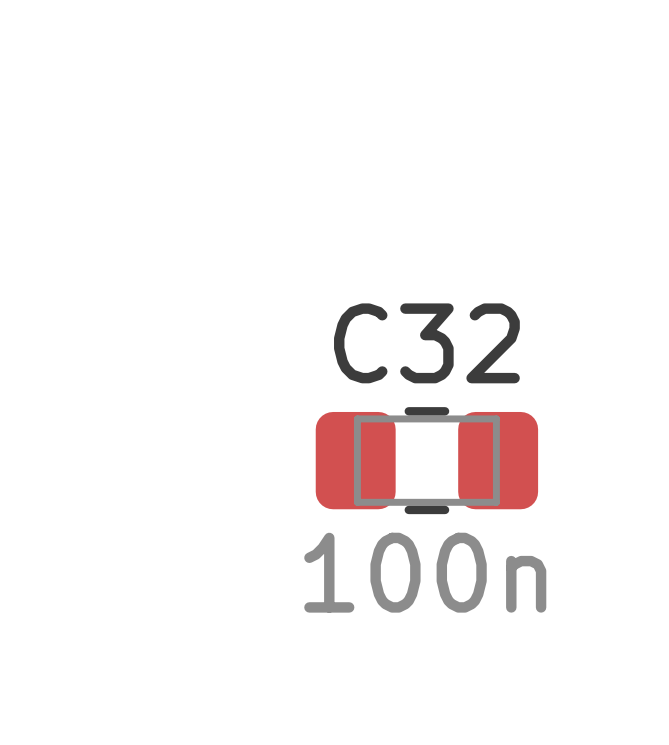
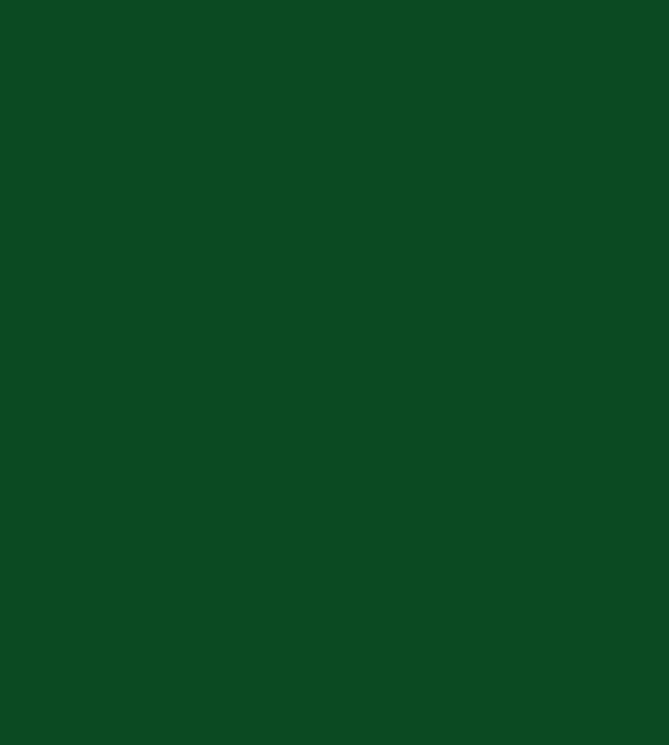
C32: 100n (426, 460) -> none

